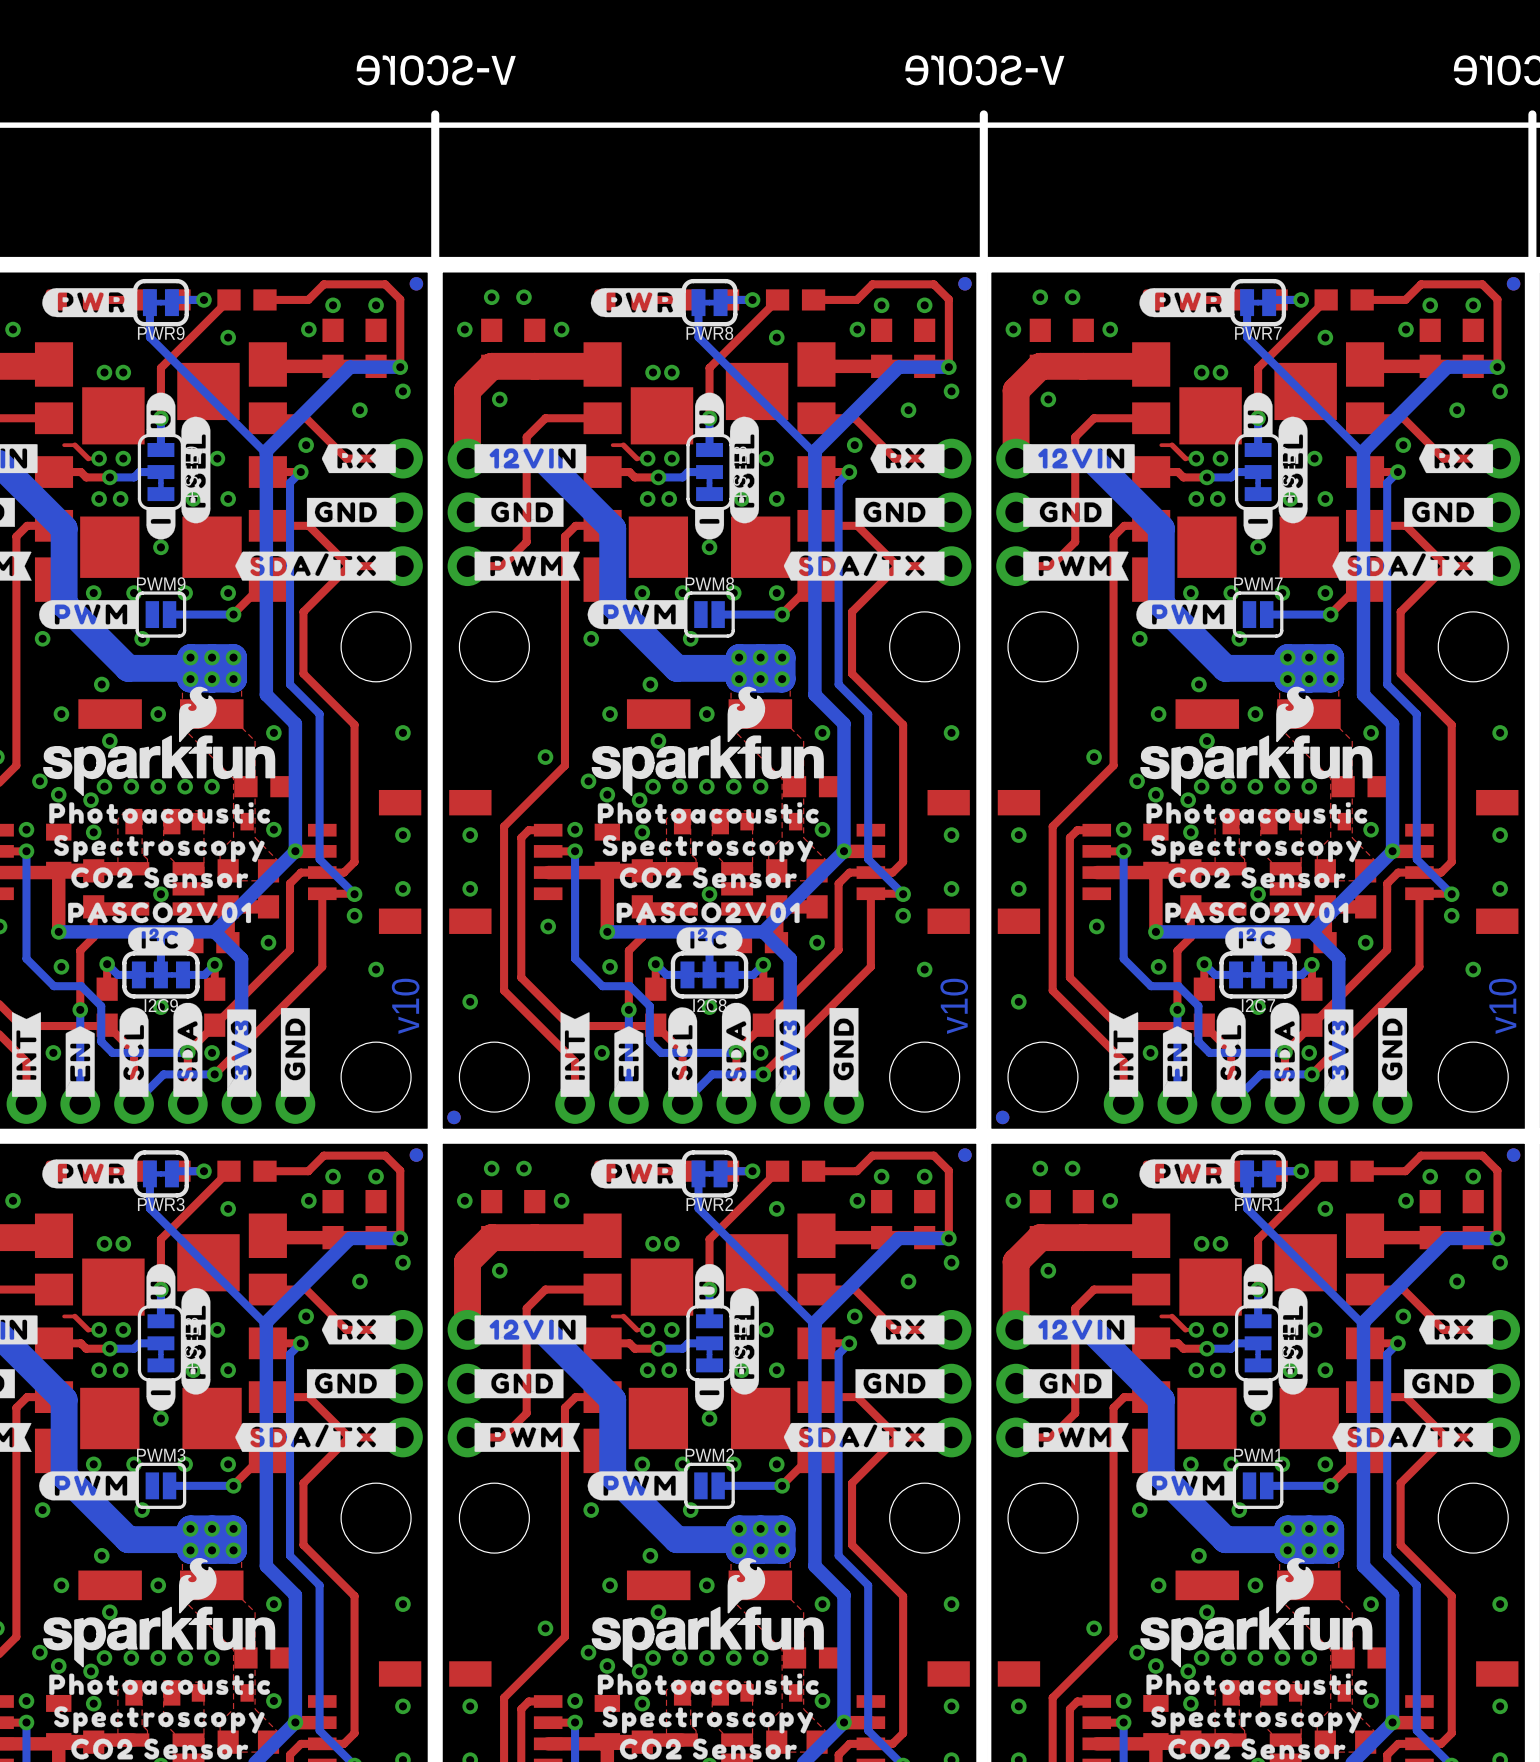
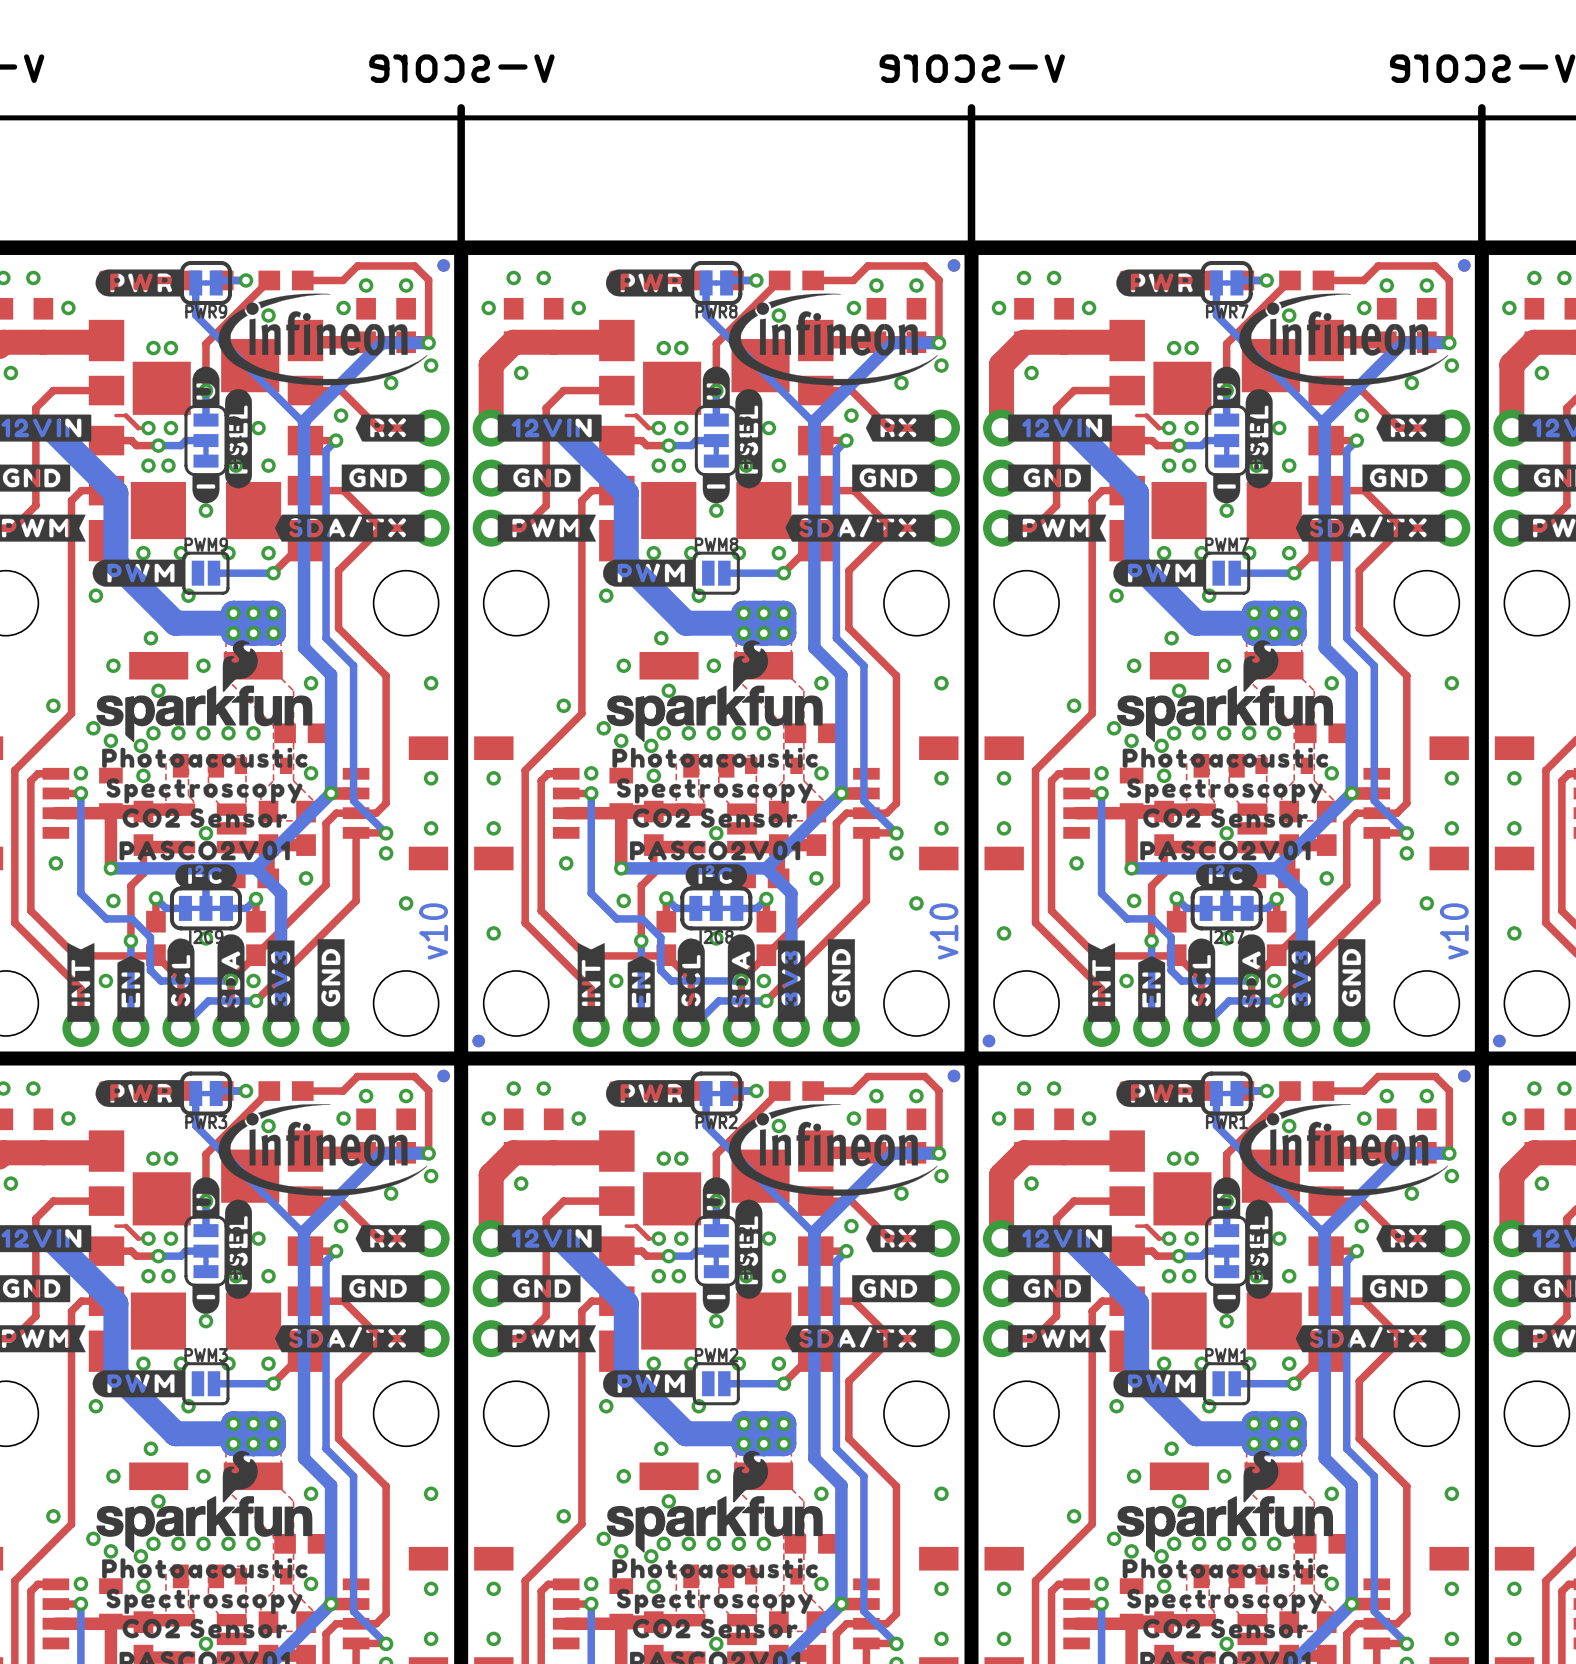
drawing: none -> [218, 293, 428, 386]
drawing: none -> [728, 293, 938, 386]
drawing: none -> [1239, 293, 1448, 386]
drawing: none -> [218, 1104, 428, 1196]
drawing: none -> [728, 1104, 938, 1196]
drawing: none -> [1239, 1104, 1448, 1196]

